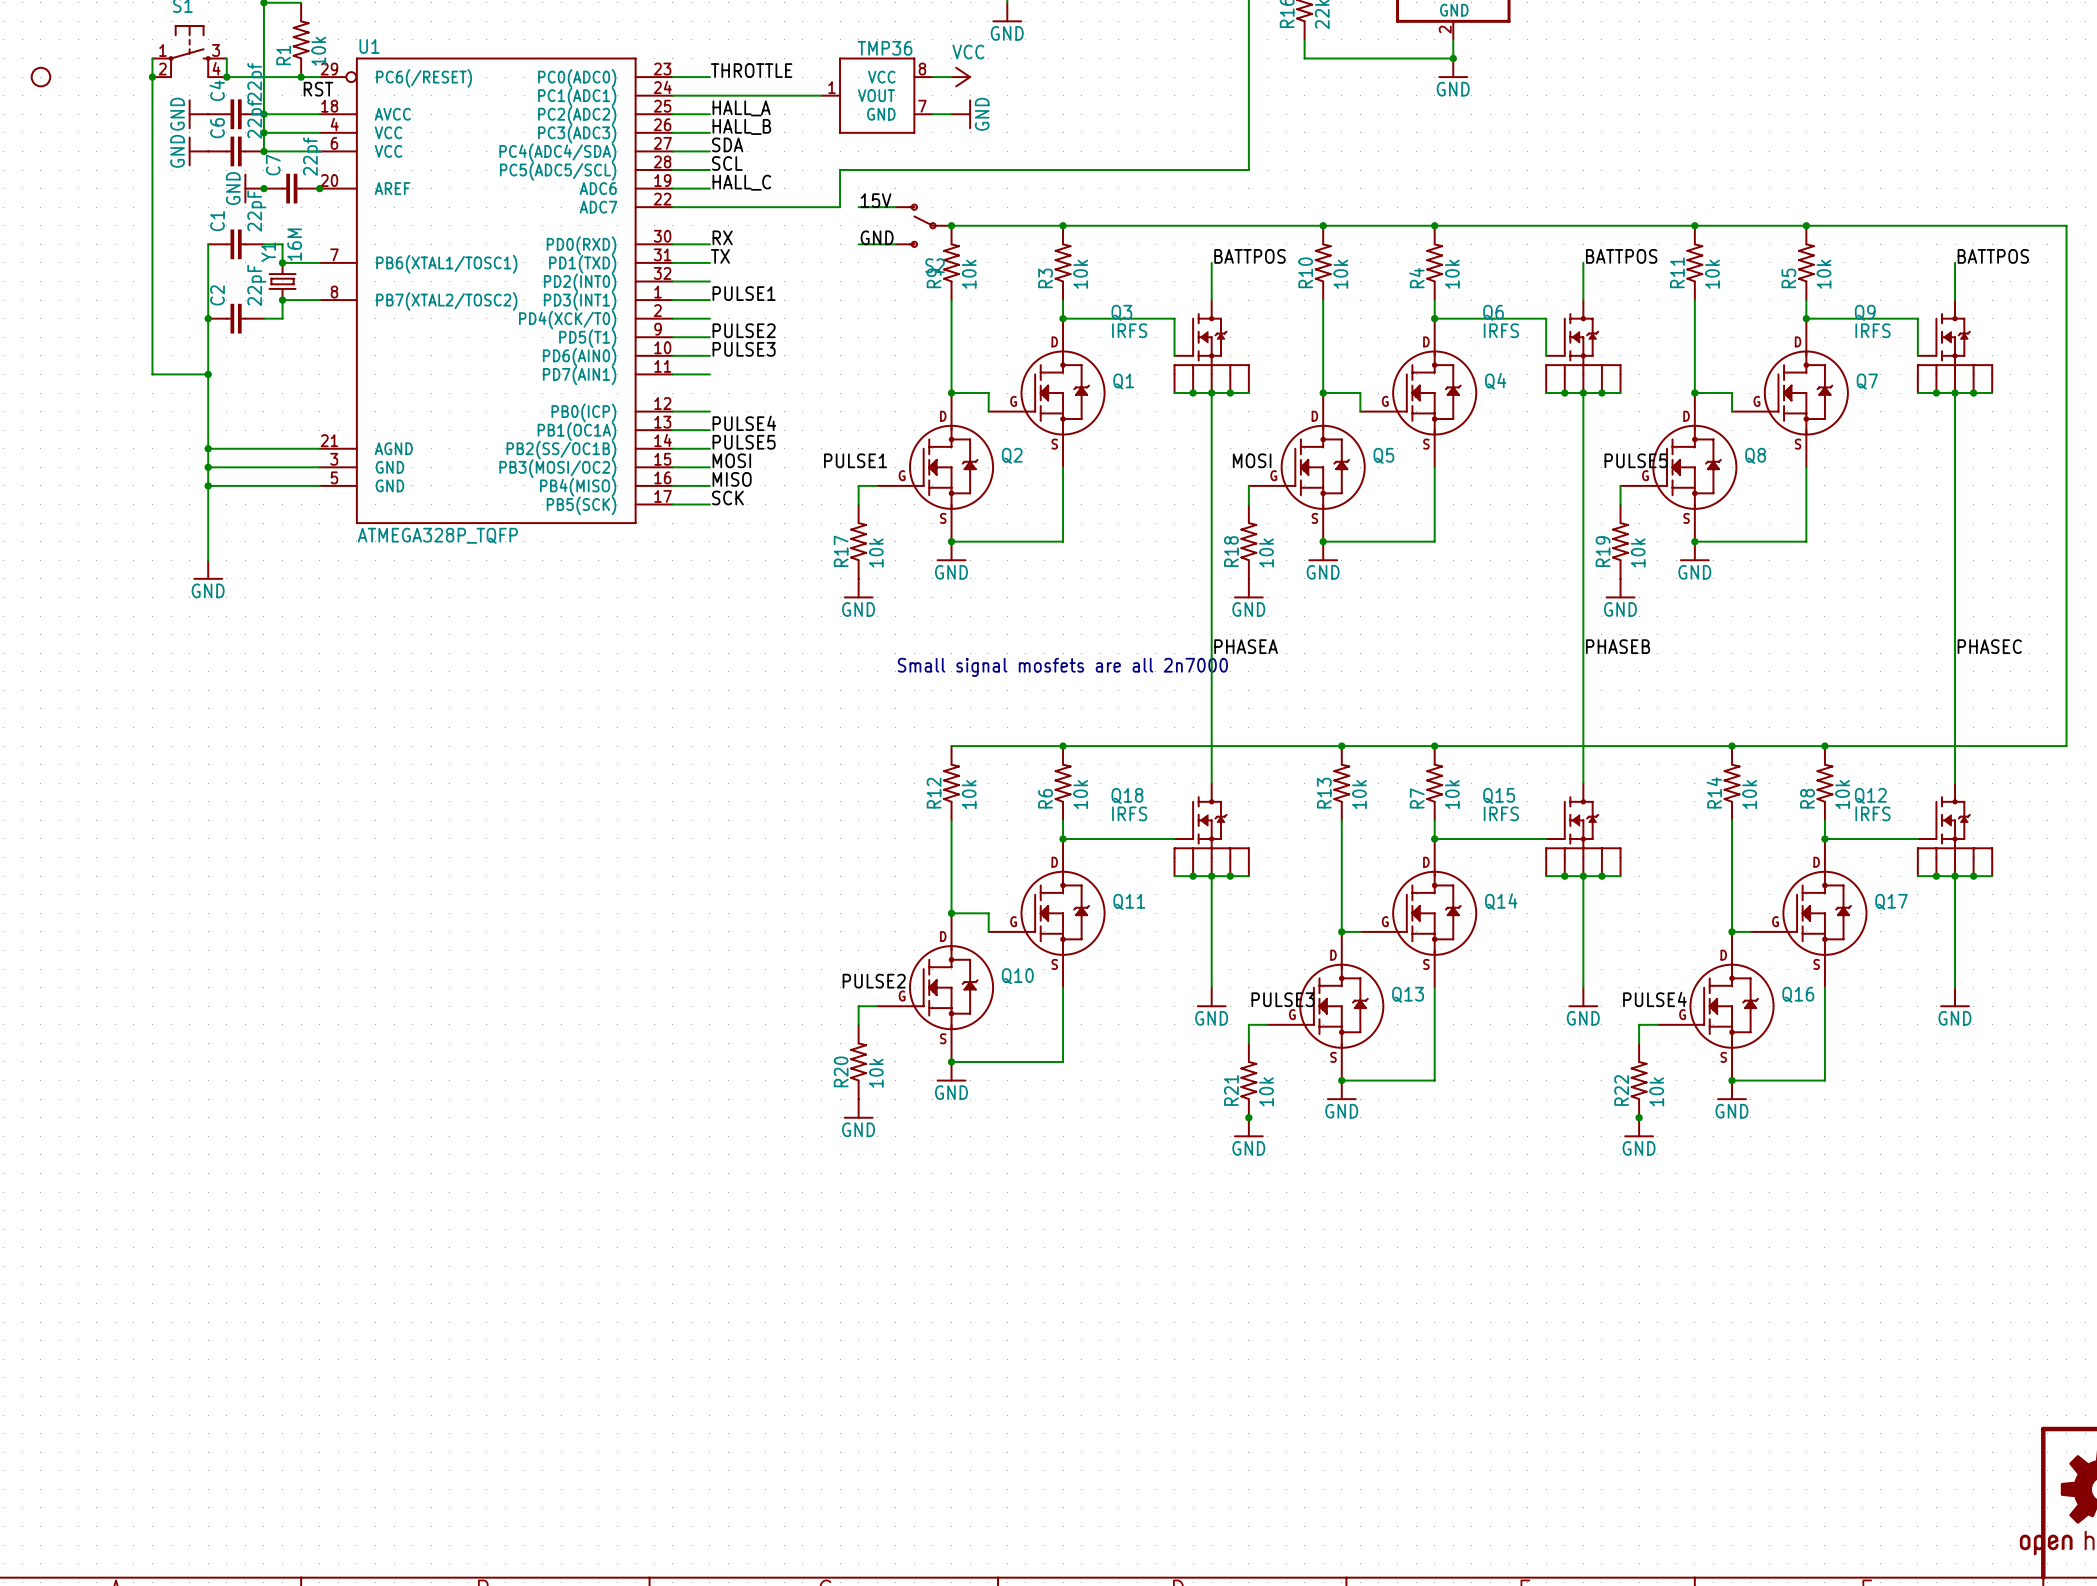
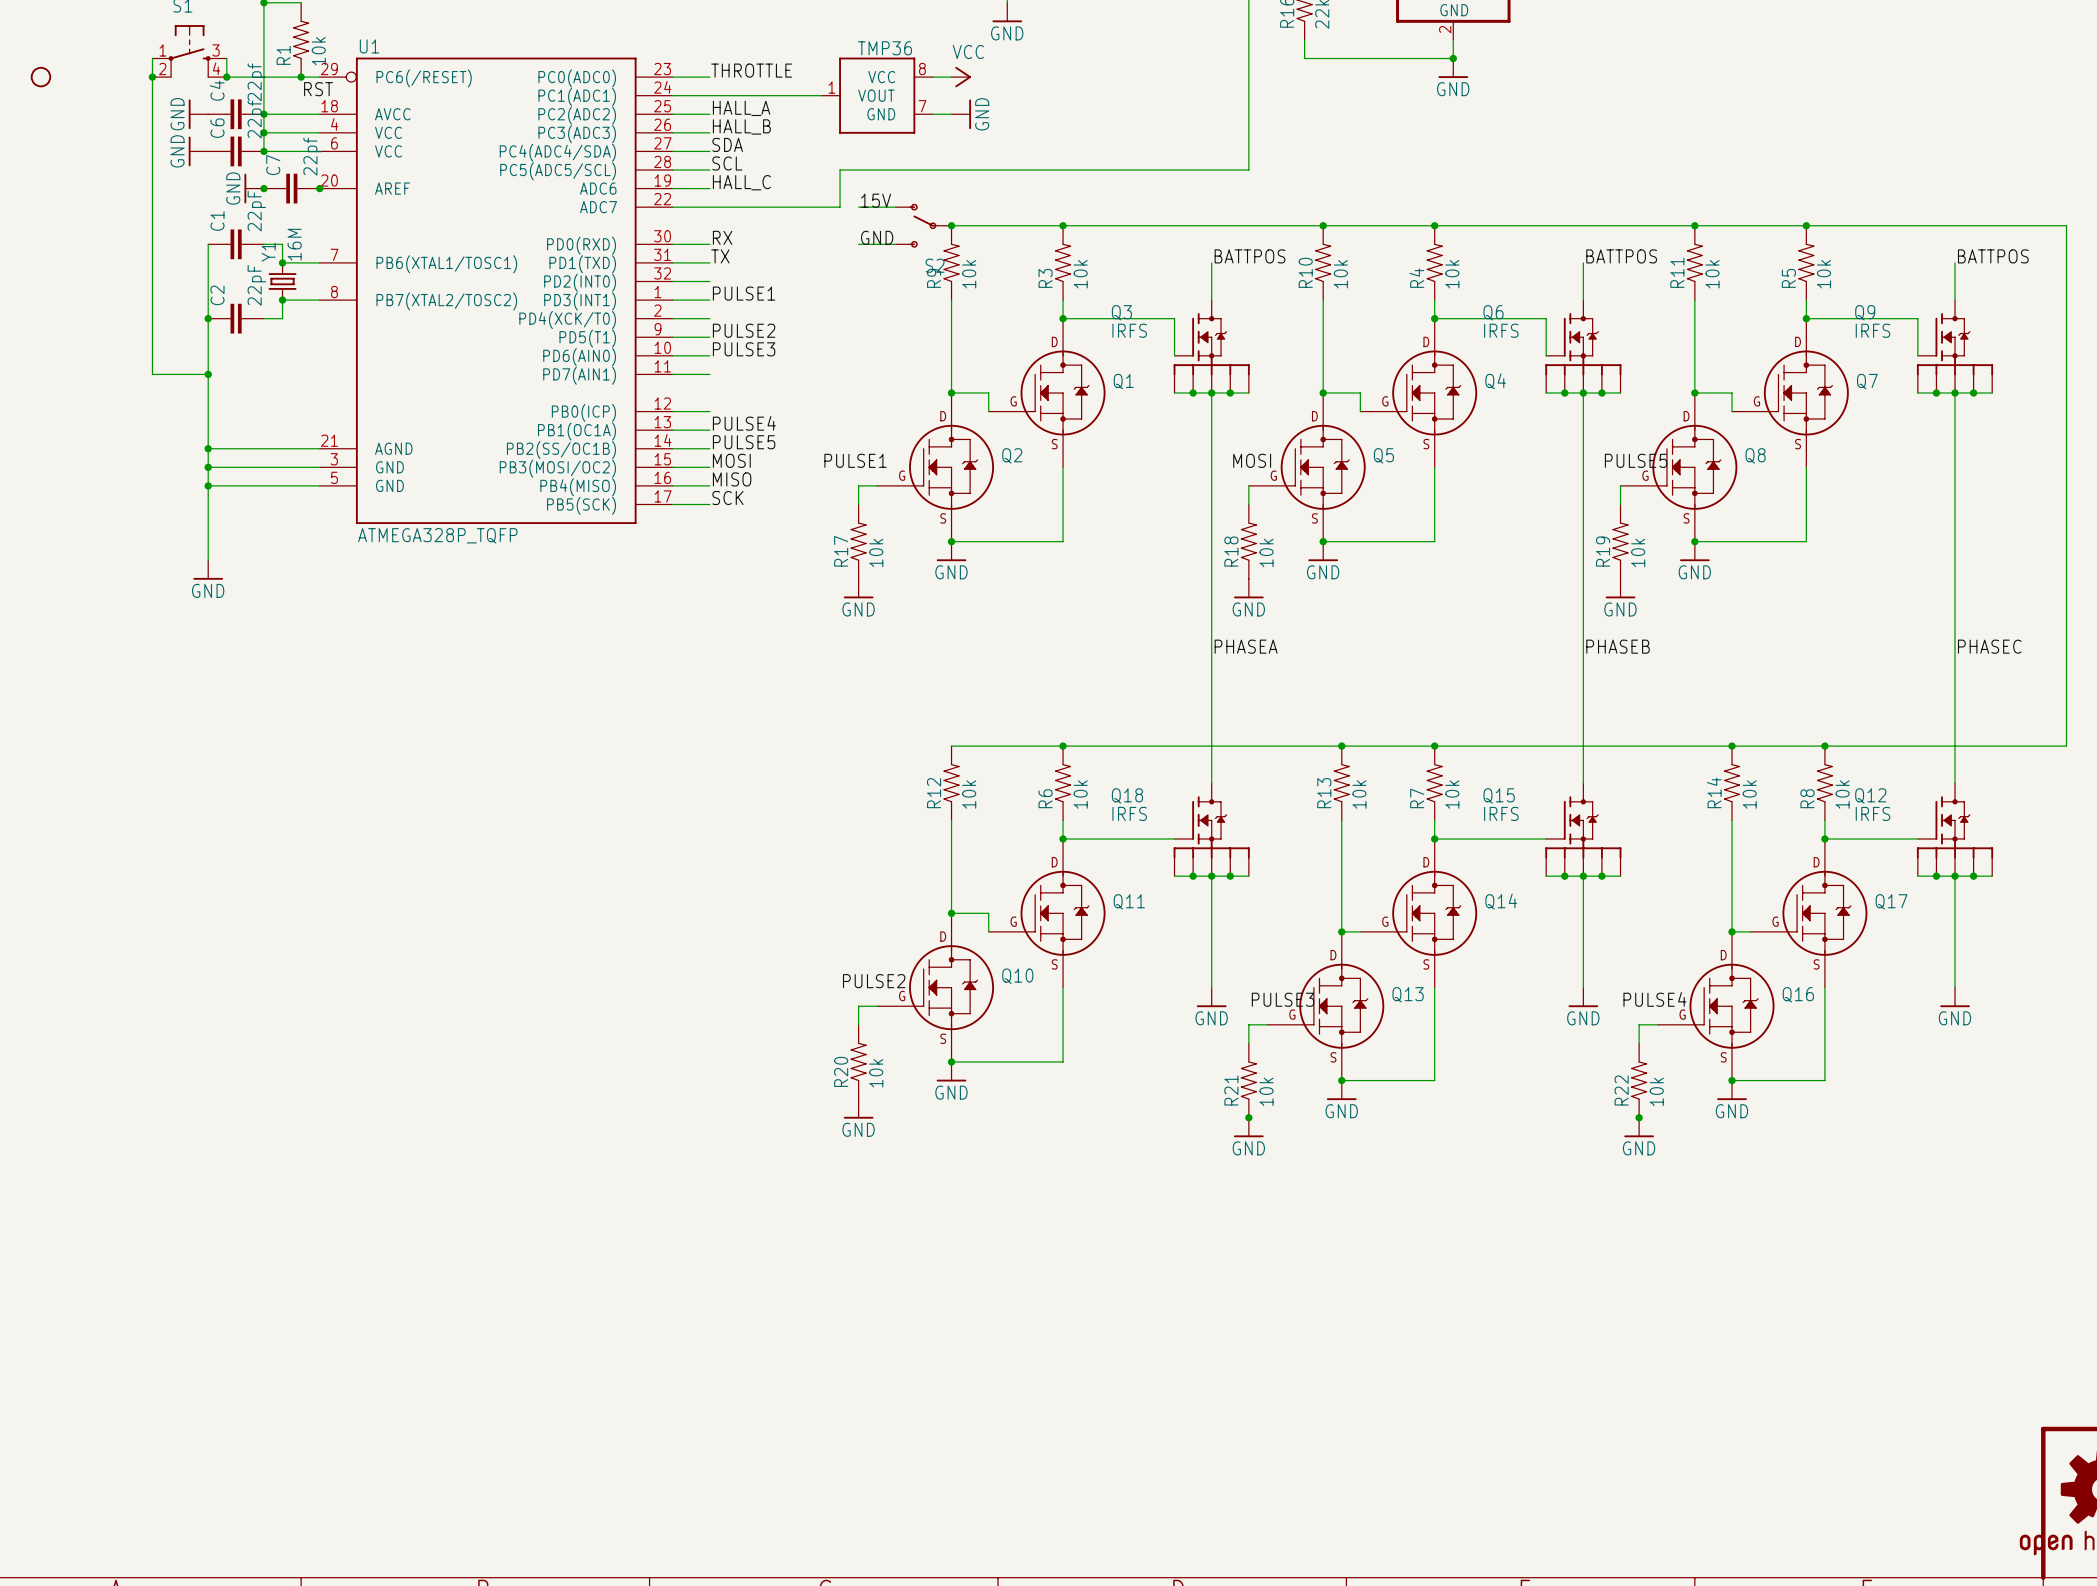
text: Small signal mosfets are all 2n7000 (1062, 667) -> none

